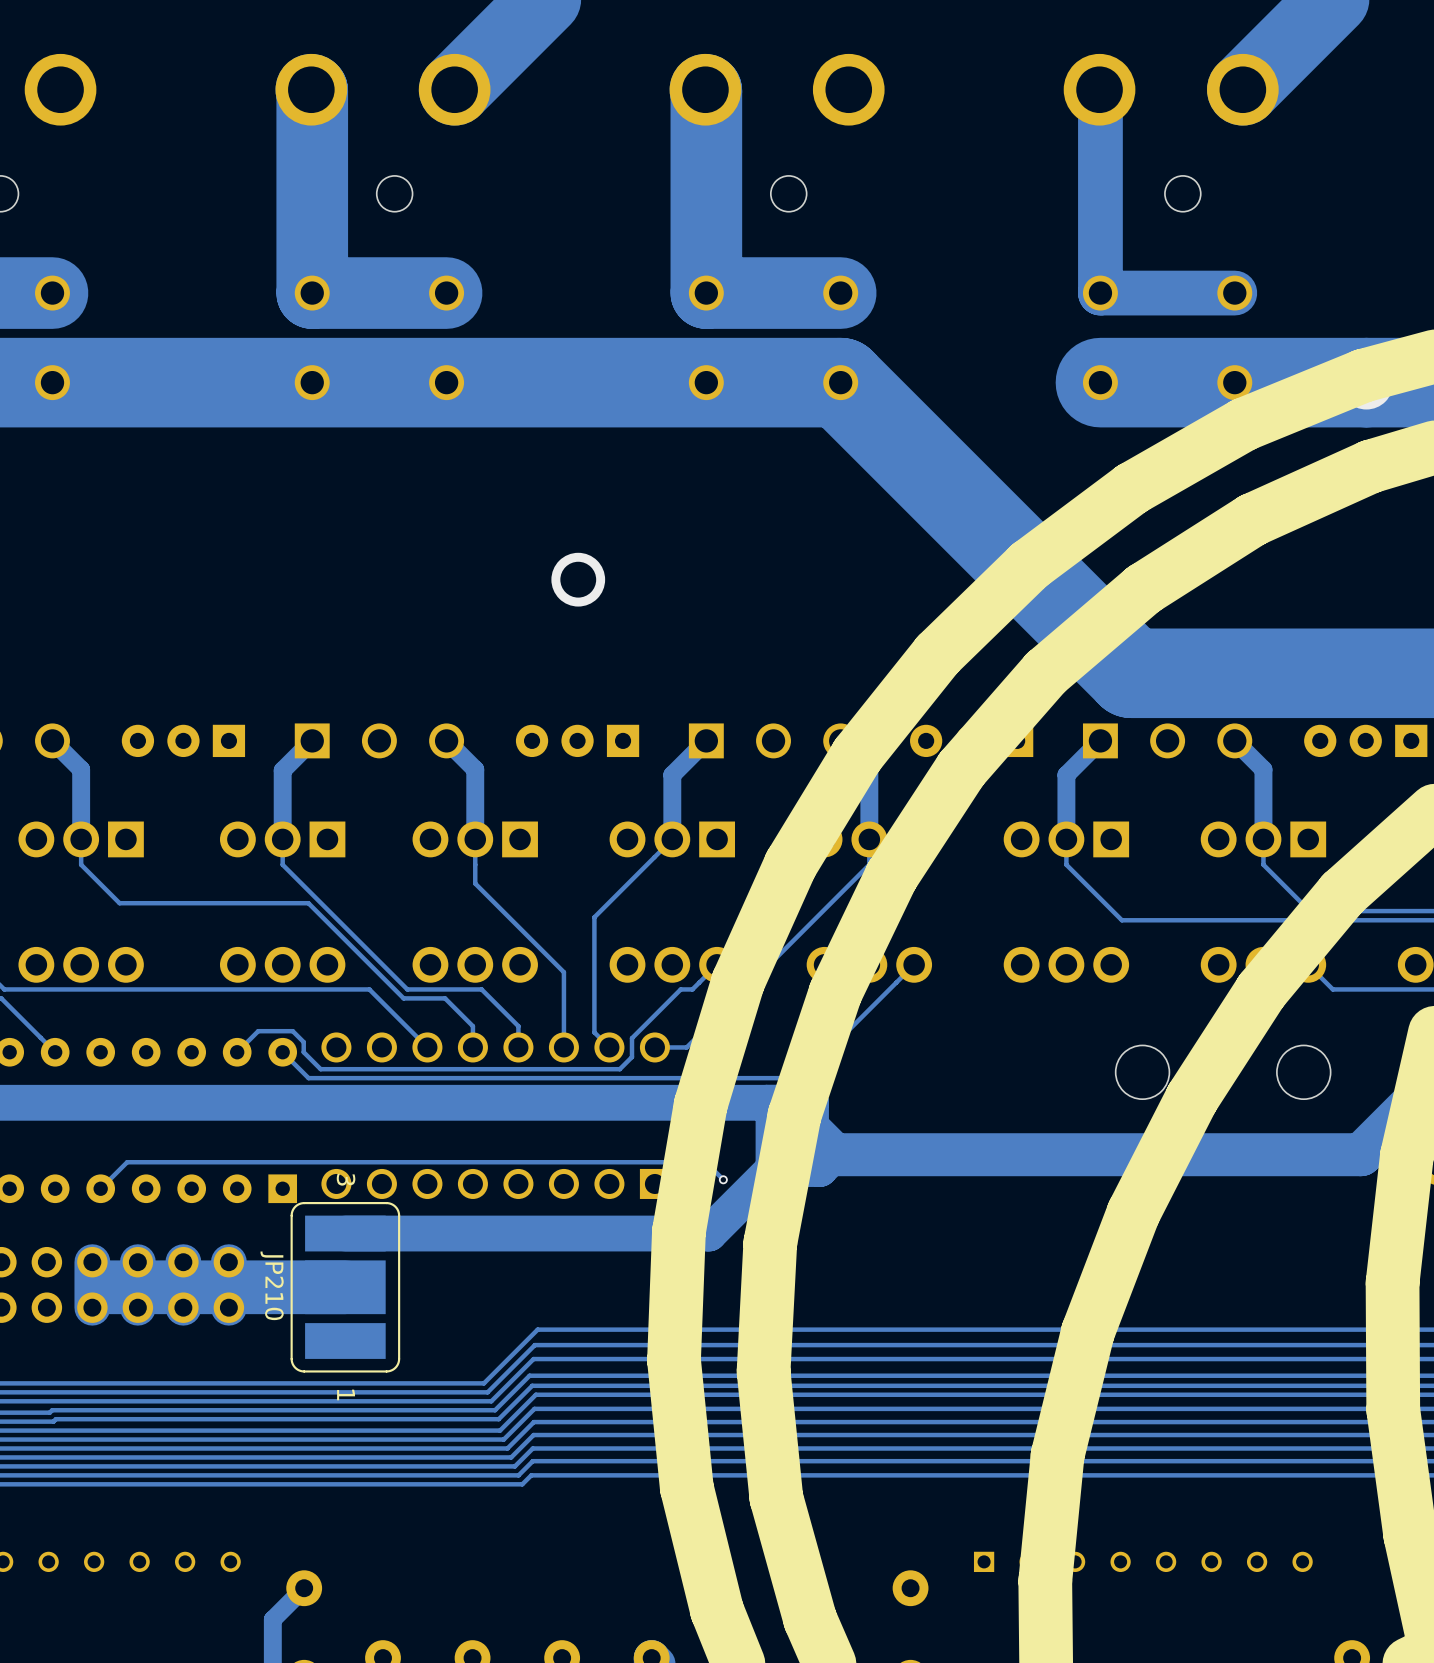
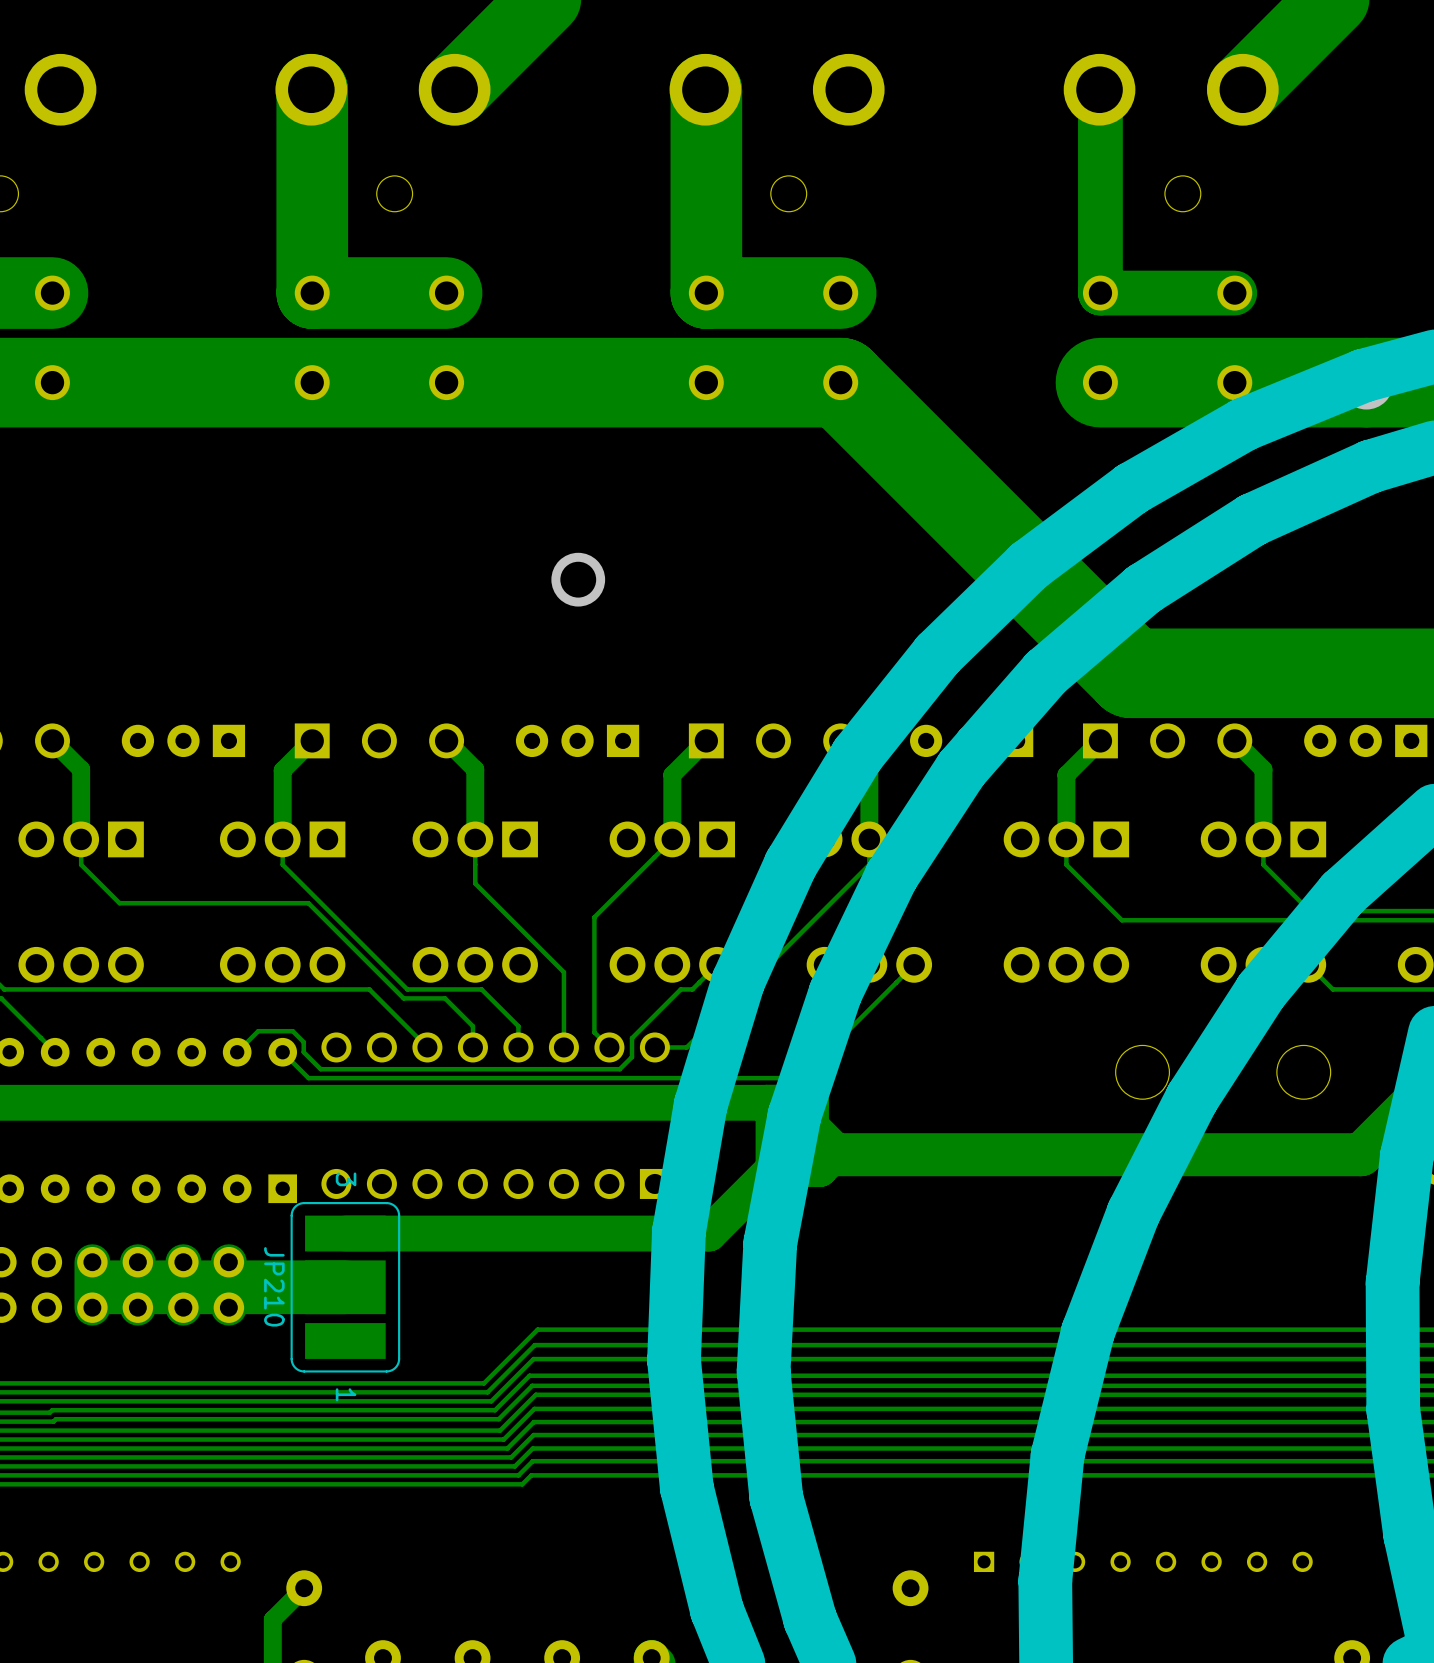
track: (723, 1179) (705, 1162) (127, 1162) (100, 1188) -> none
via: (723, 1179) -> none

